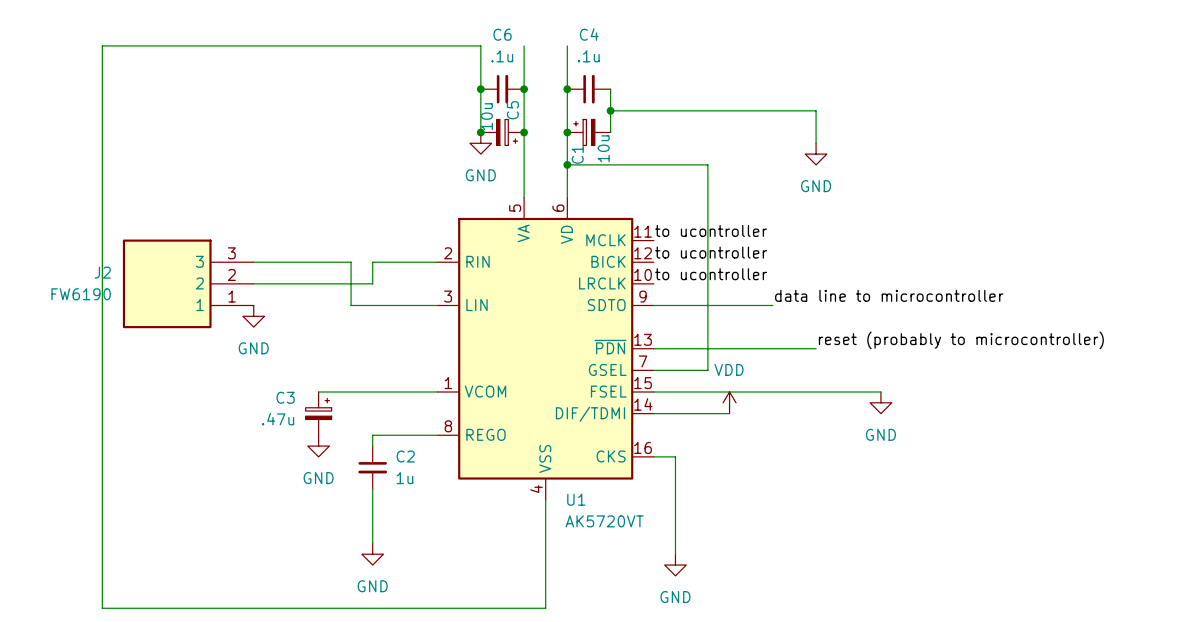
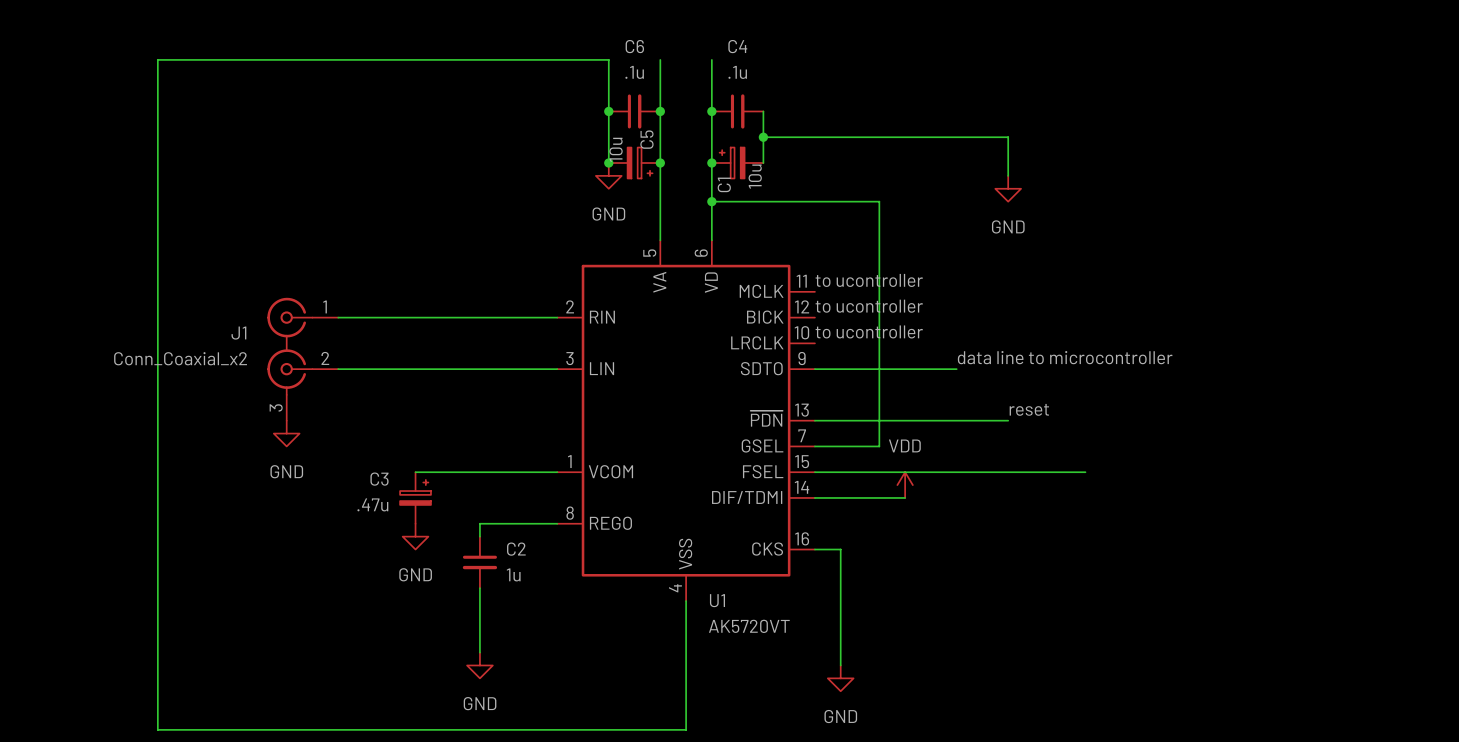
wire: (351, 262) (351, 305) -> (454, 317) (479, 317)
wire: (372, 262) (372, 283) (253, 283) -> none
J2: FW6190 (188, 283) -> none
J1: none -> Conn_Coaxial_x2 (302, 359)
wire: none -> (338, 369) (454, 369)
power symbol position: GND (253, 316) -> GND (286, 433)
label: reset (probably to microcontroller) (961, 340) -> reset (1029, 409)
power symbol: GND (880, 402) -> none

